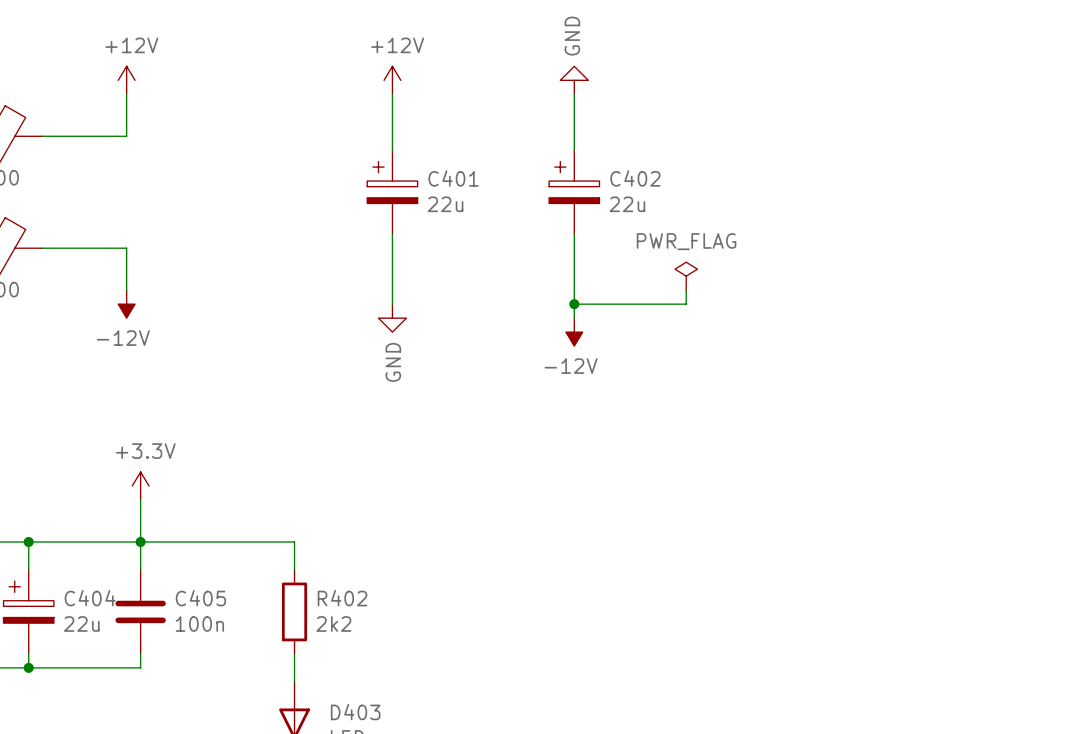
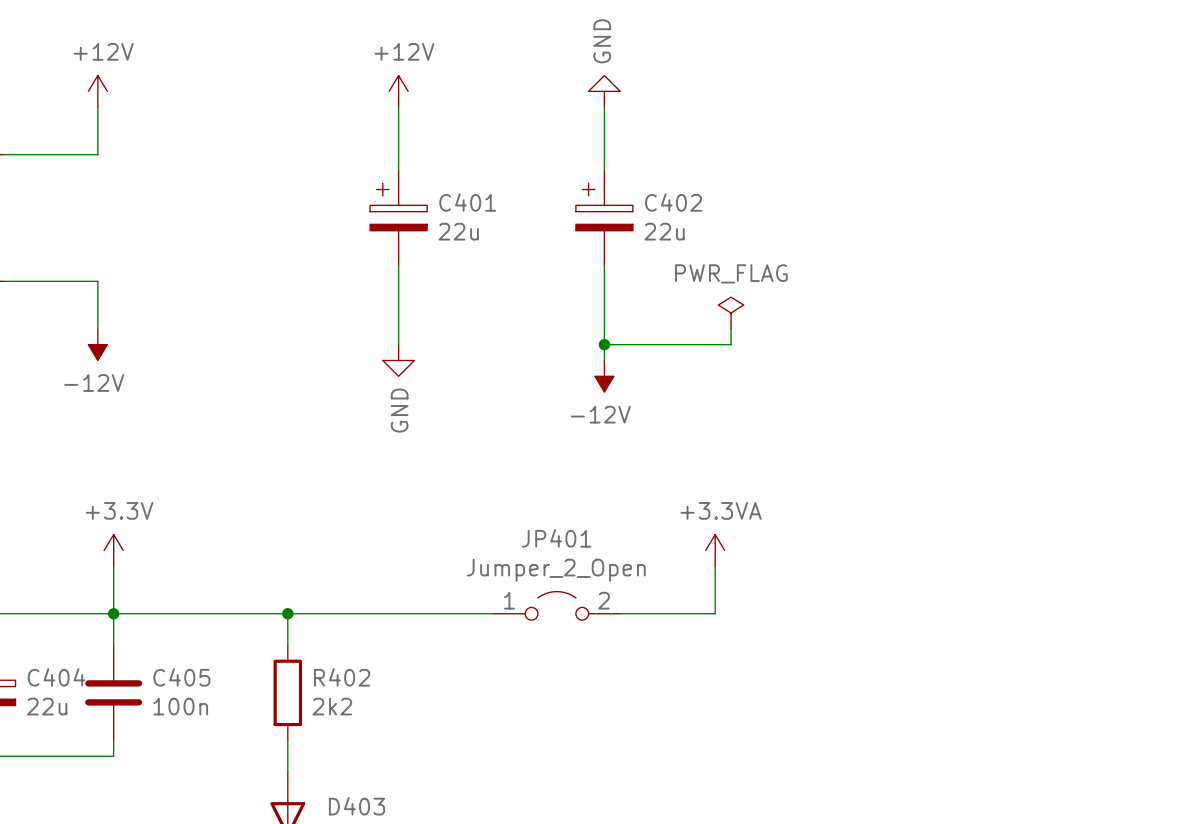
power symbol: none -> +3.3VA (715, 550)
wire: none -> (715, 566) (715, 613) (620, 613)
JP401: none -> Jumper_2_Open (556, 605)
wire: none -> (287, 613) (493, 613)
junction: none -> (287, 613)

